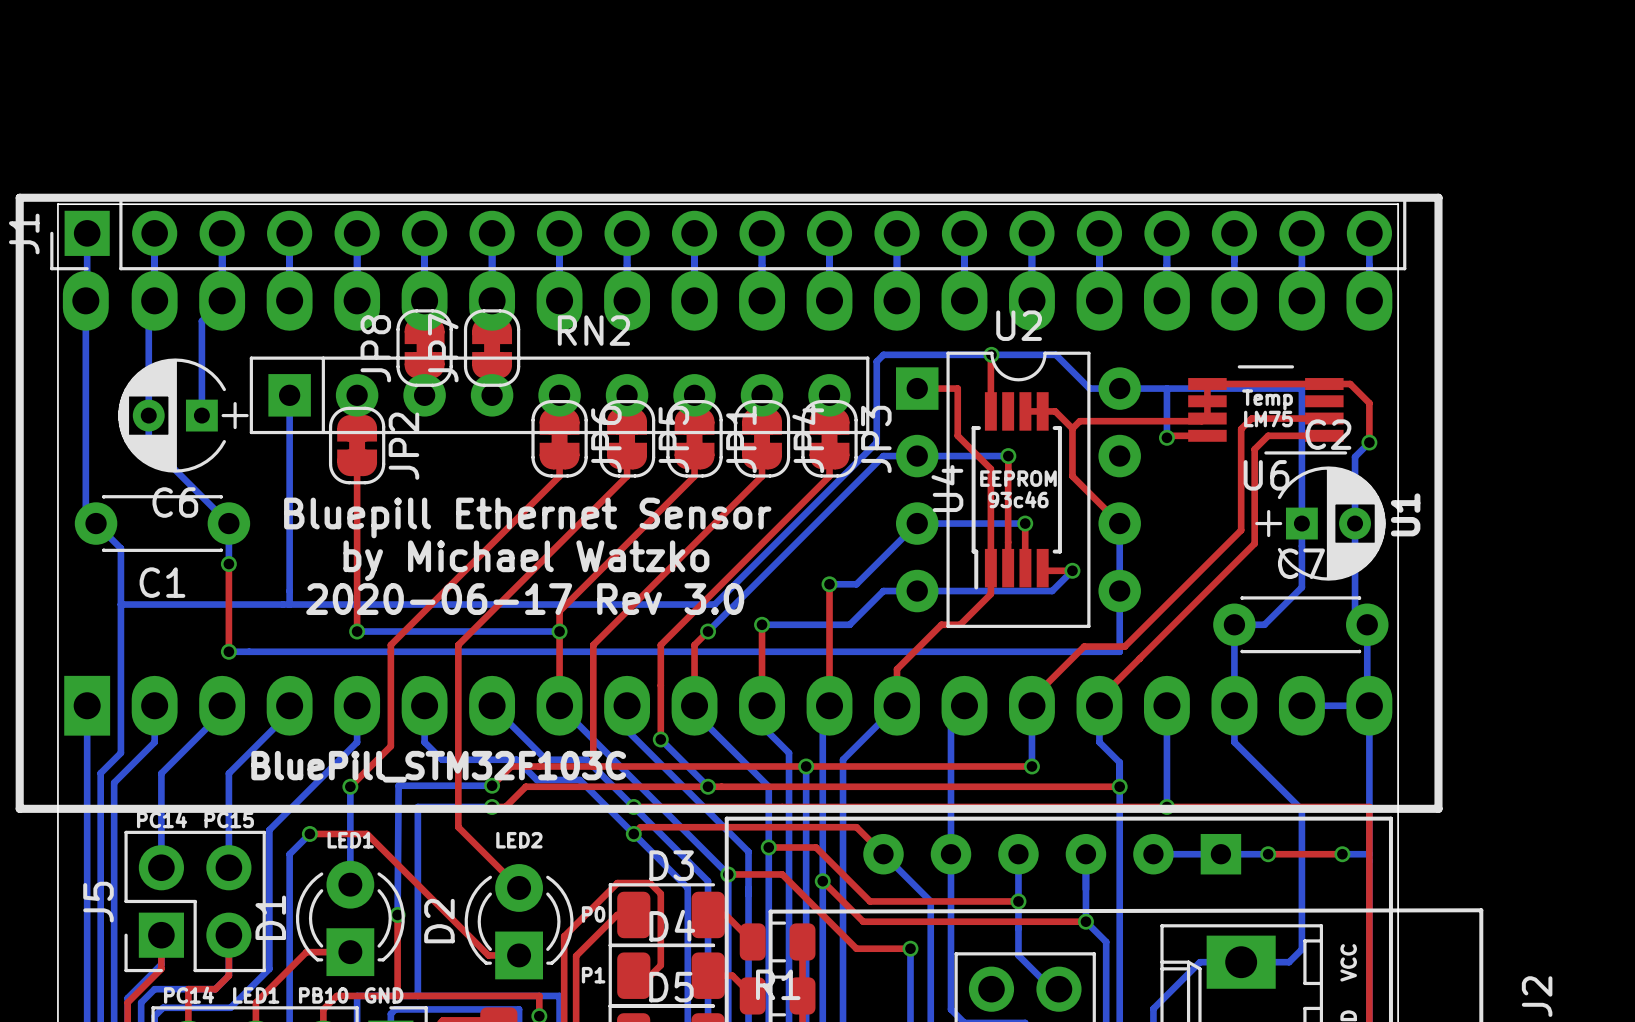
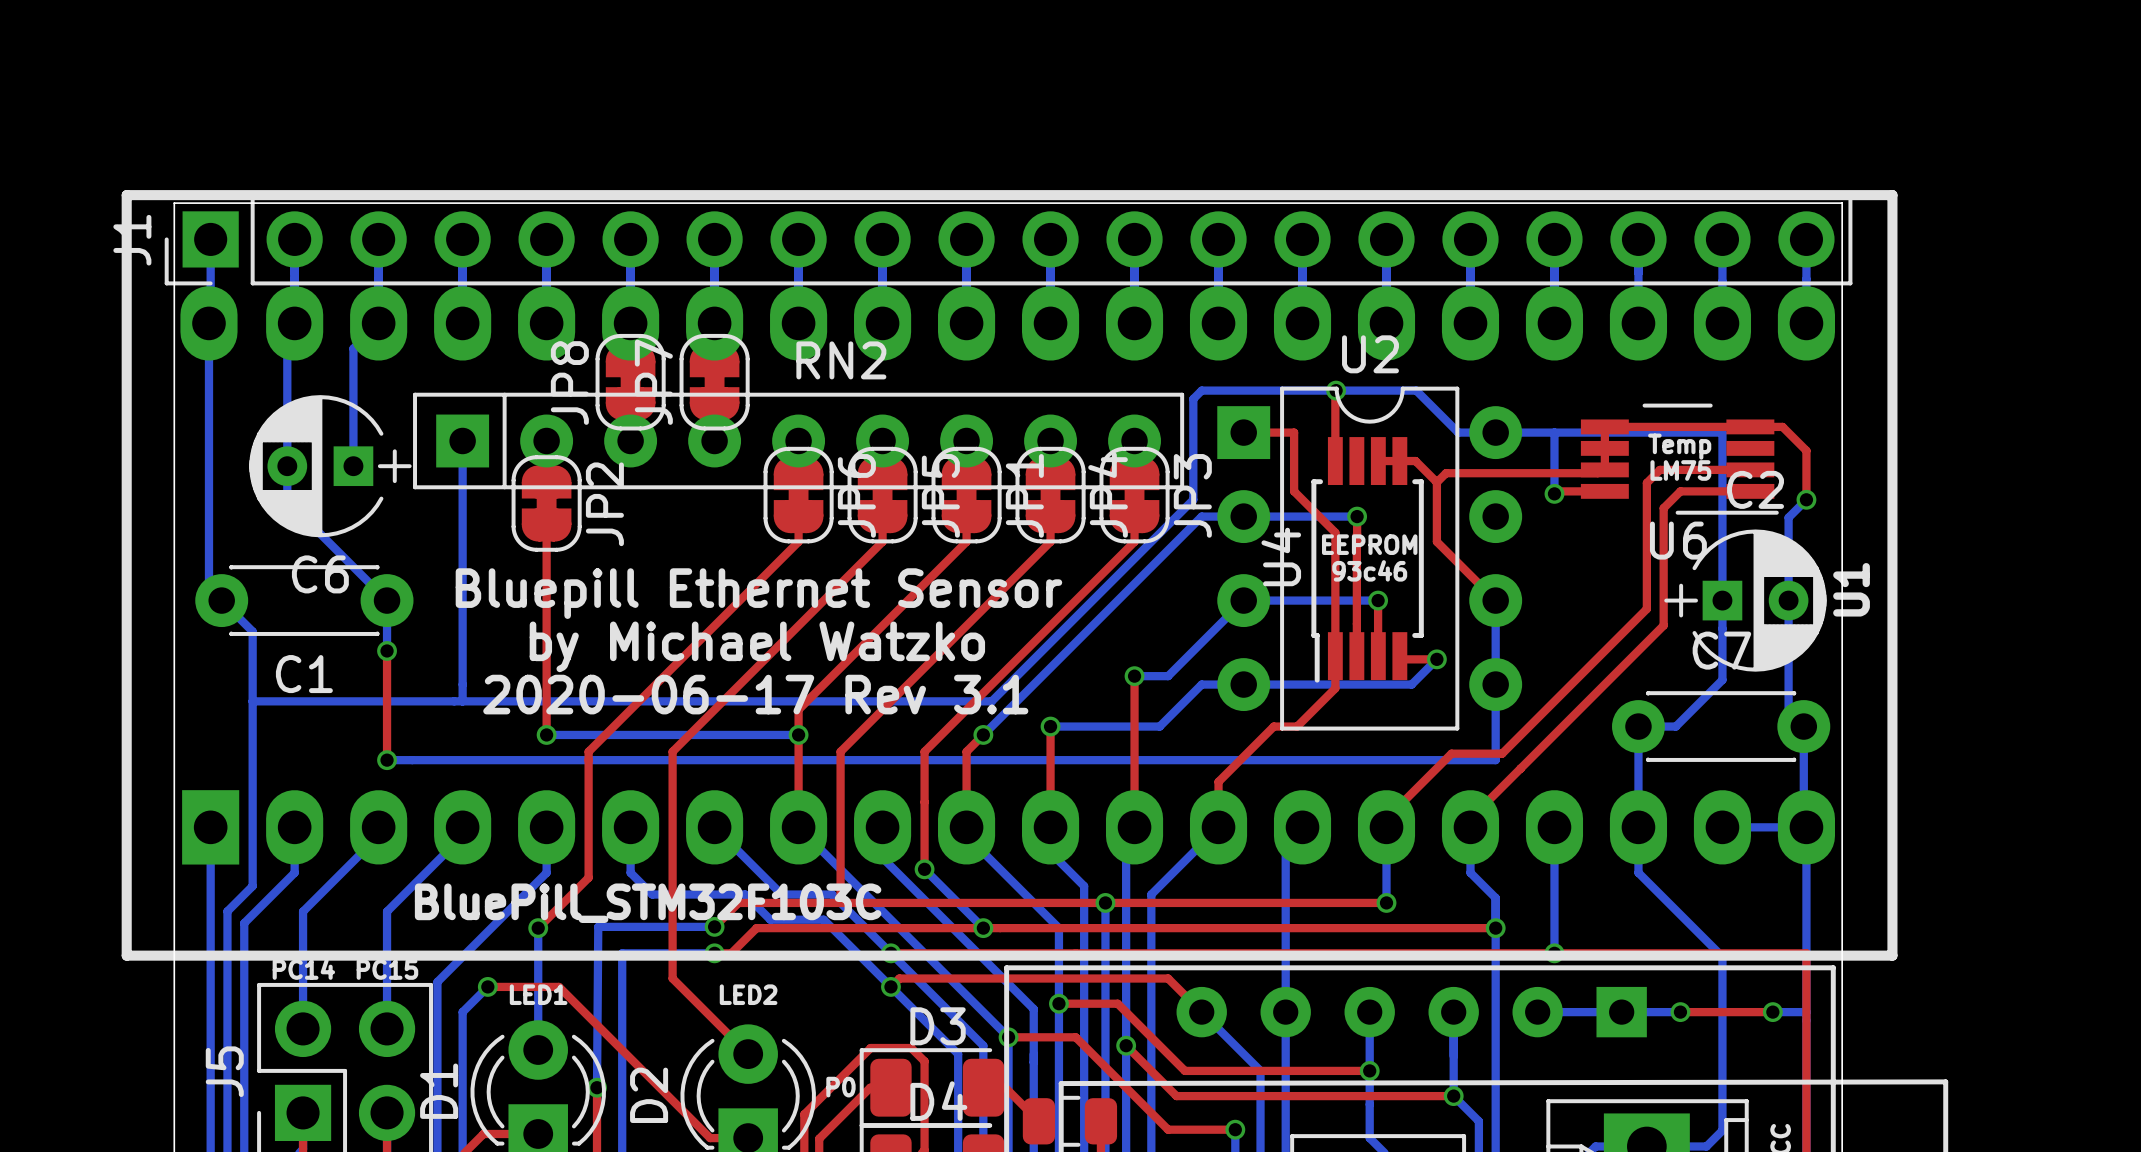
text: 2020-06-17 Rev 3.0 (525, 599) -> 2020-06-17 Rev 3.1 (755, 694)

